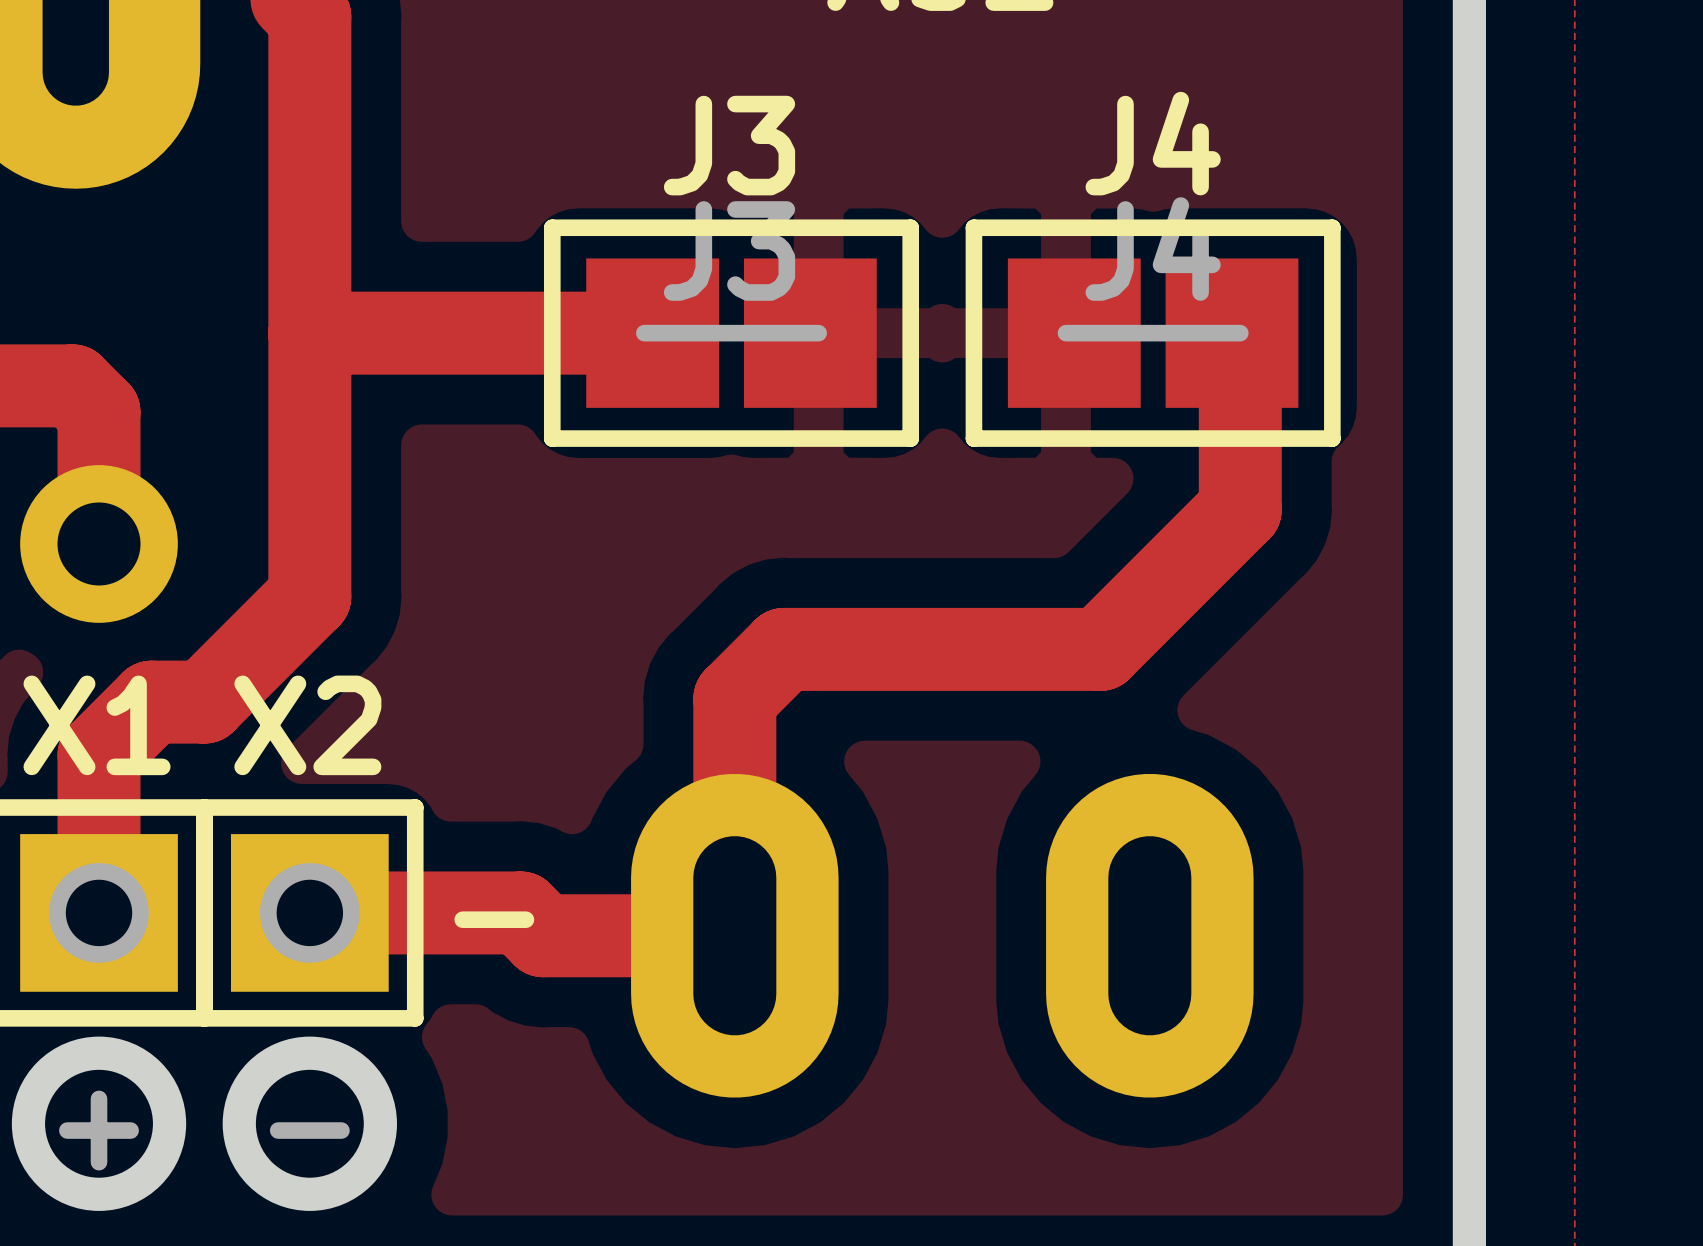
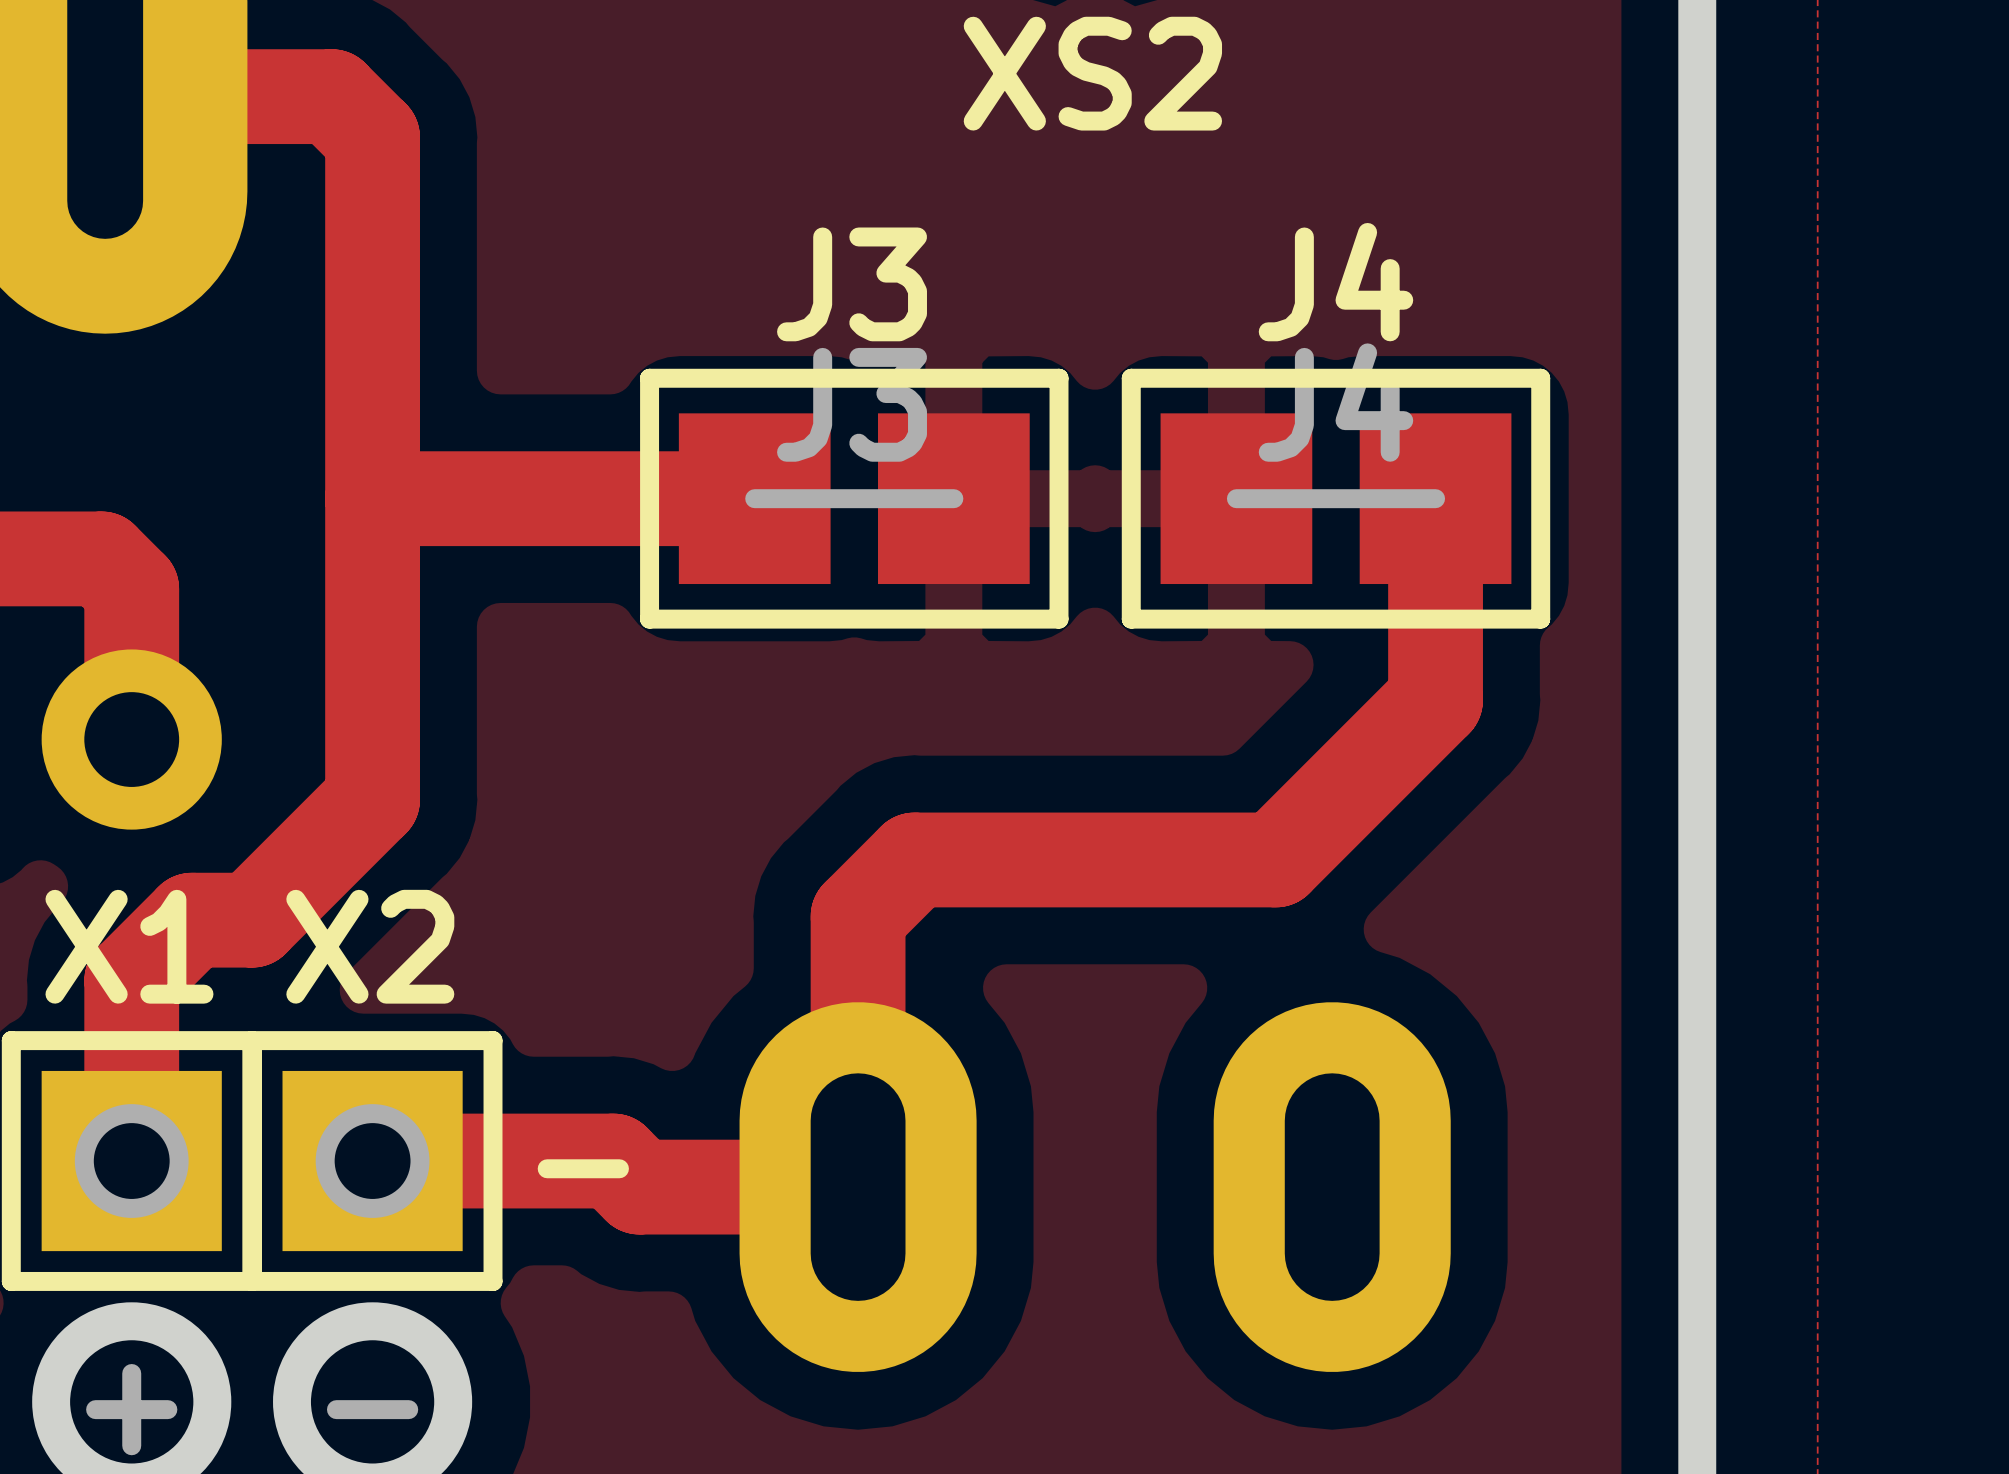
J3 footprint: [543, 219, 919, 447] -> [640, 368, 1069, 629]
J4 footprint: [965, 219, 1341, 447] -> [1121, 368, 1551, 629]

